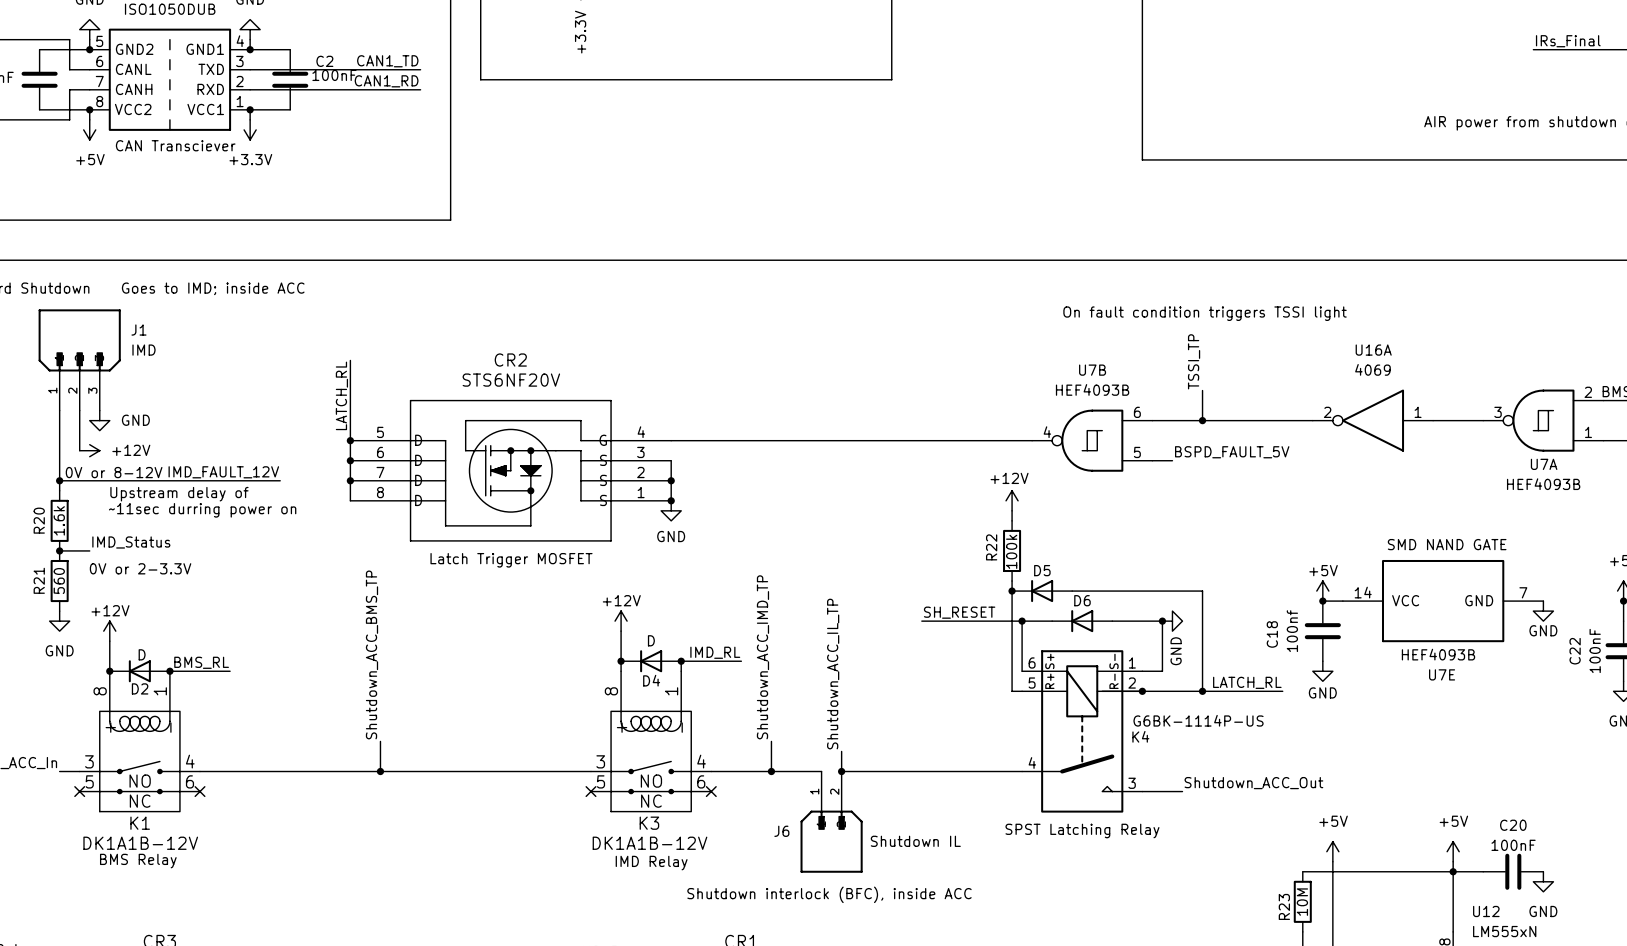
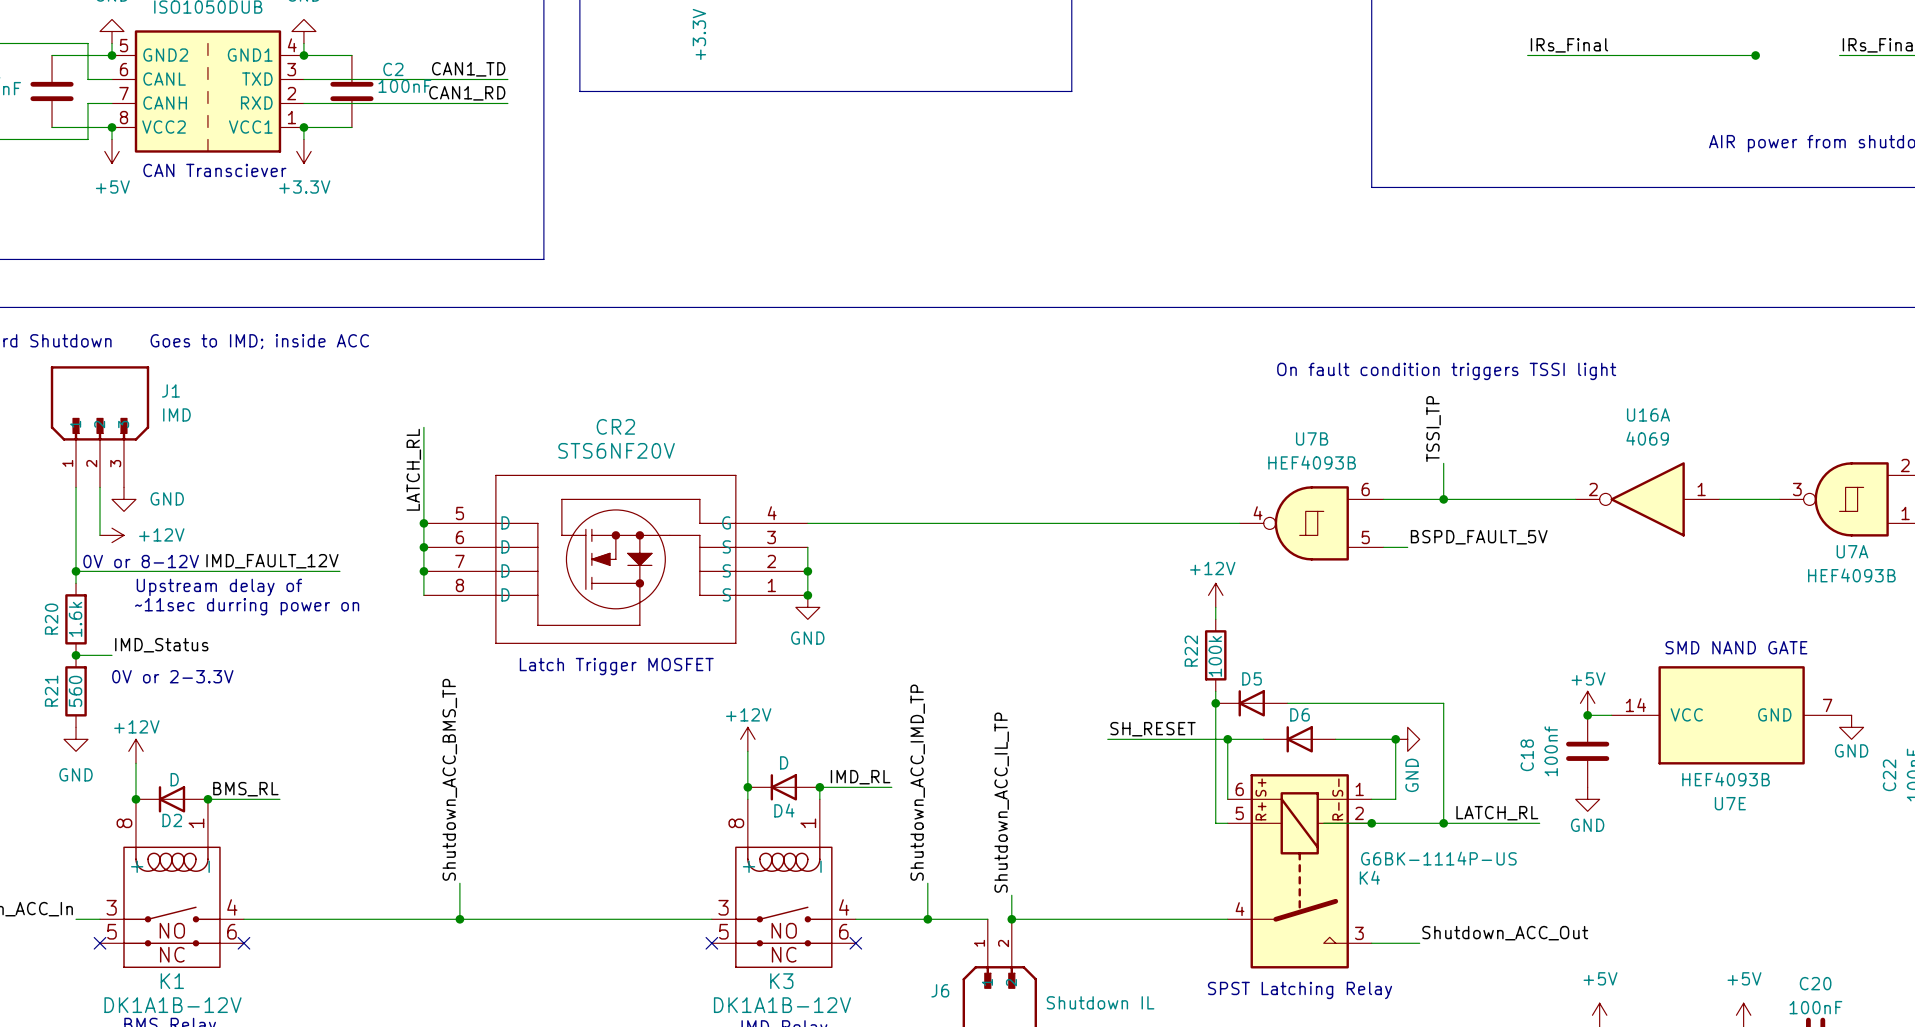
label: none -> IRs_Final (1569, 45)
wire: none -> (1527, 55) (1755, 55)
junction: none -> (1755, 55)

